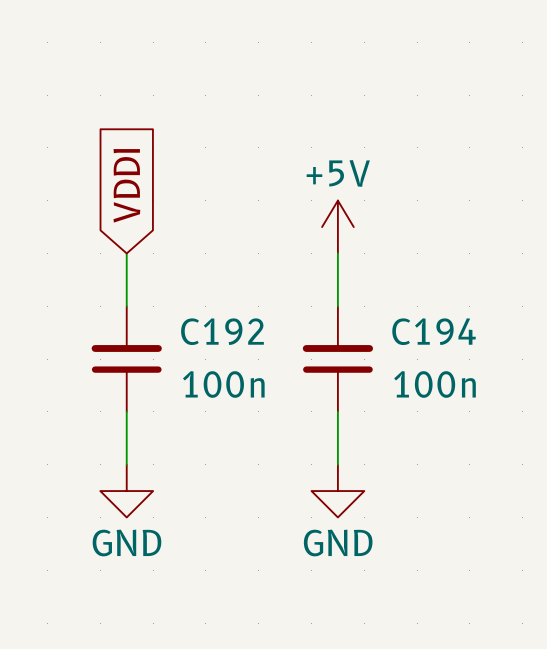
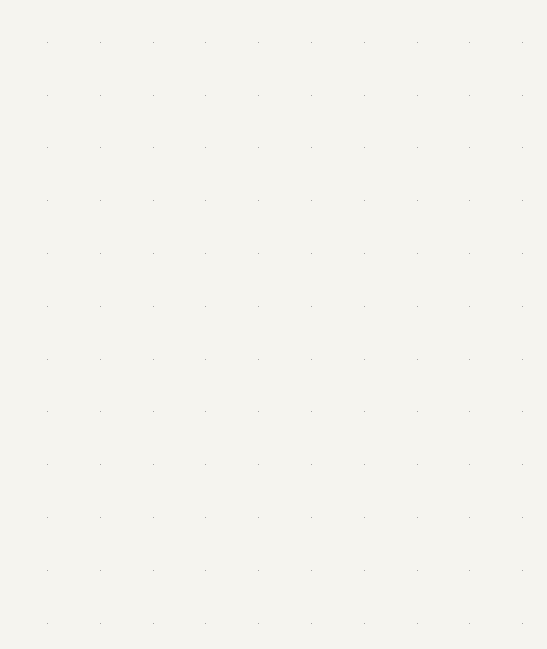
global label: VDDI (126, 185) -> none
power symbol: +5V (337, 227) -> none
wire: (126, 253) (126, 306) -> none
wire: (337, 253) (337, 306) -> none
C192: (126, 359) -> none
C194: (337, 359) -> none
wire: (126, 411) (126, 464) -> none
wire: (337, 411) (337, 464) -> none
power symbol: GND (126, 491) -> none
power symbol: GND (337, 491) -> none

